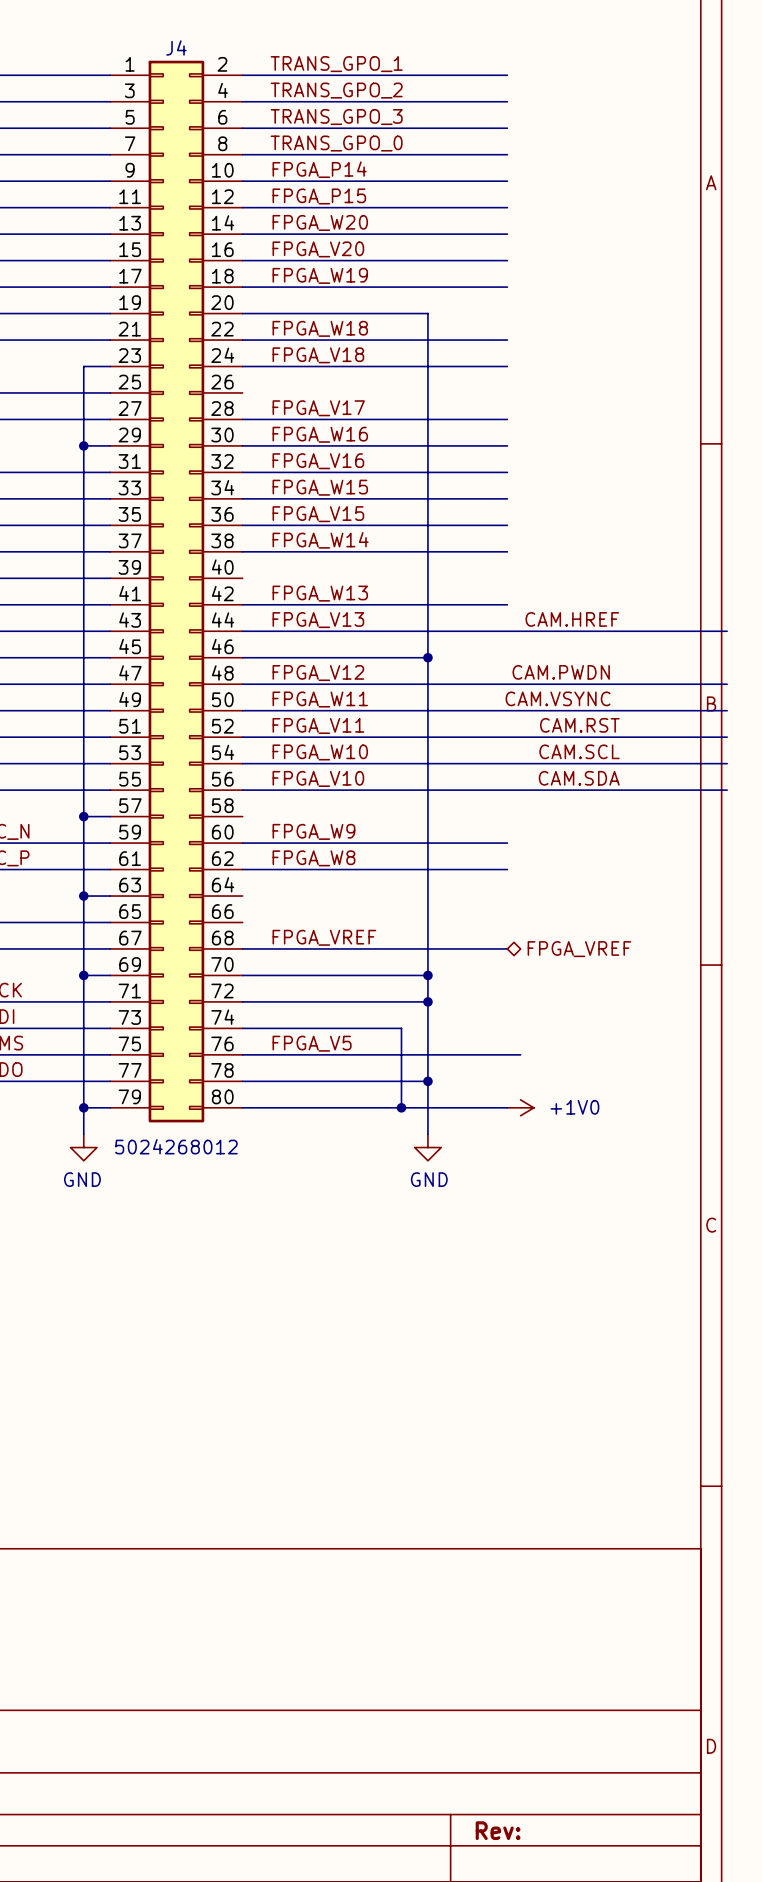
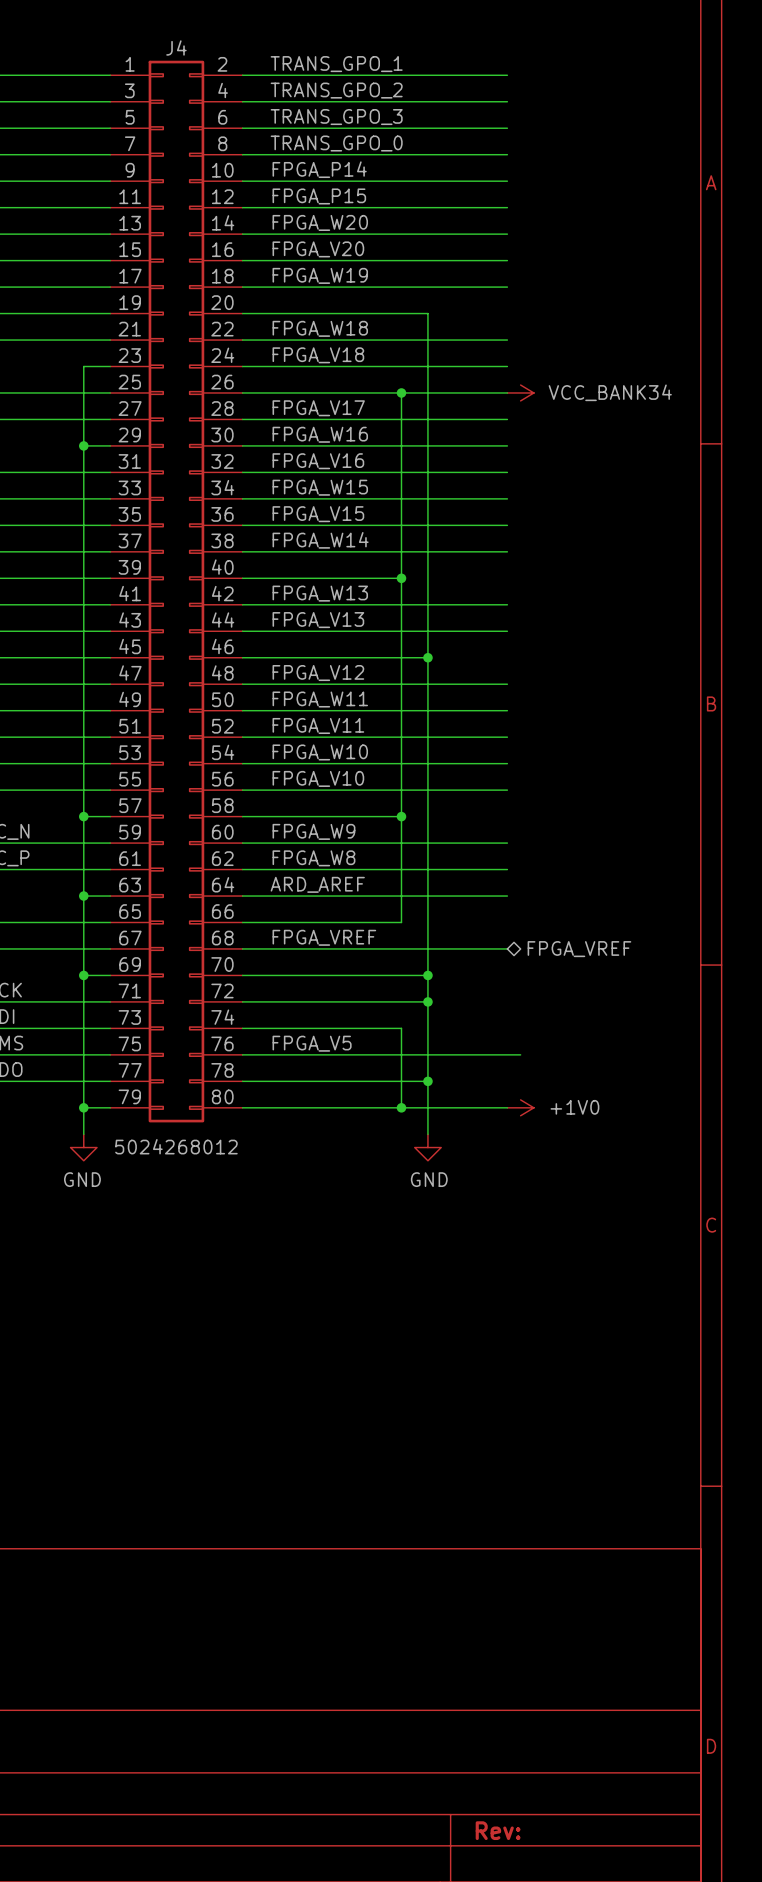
wire: none -> (242, 392) (507, 392)
wire: none -> (401, 392) (401, 922) (242, 922)
junction: none -> (401, 392)
power symbol: none -> VCC_BANK34 (520, 392)
wire: none -> (242, 578) (401, 578)
junction: none -> (401, 578)
label: CAM.HREF (572, 619) -> none
wire: (507, 631) (727, 631) -> none
label: CAM.PWDN (561, 672) -> none
wire: (507, 684) (727, 684) -> none
label: CAM.VSYNC (558, 698) -> none
wire: (507, 710) (727, 710) -> none
label: CAM.RST (579, 725) -> none
wire: (507, 737) (727, 737) -> none
label: CAM.SCL (579, 751) -> none
wire: (507, 763) (727, 763) -> none
label: CAM.SDA (579, 778) -> none
wire: (507, 790) (727, 790) -> none
wire: none -> (242, 816) (401, 816)
junction: none -> (401, 816)
label: none -> ARD_AREF (317, 884)
wire: none -> (242, 896) (507, 896)

